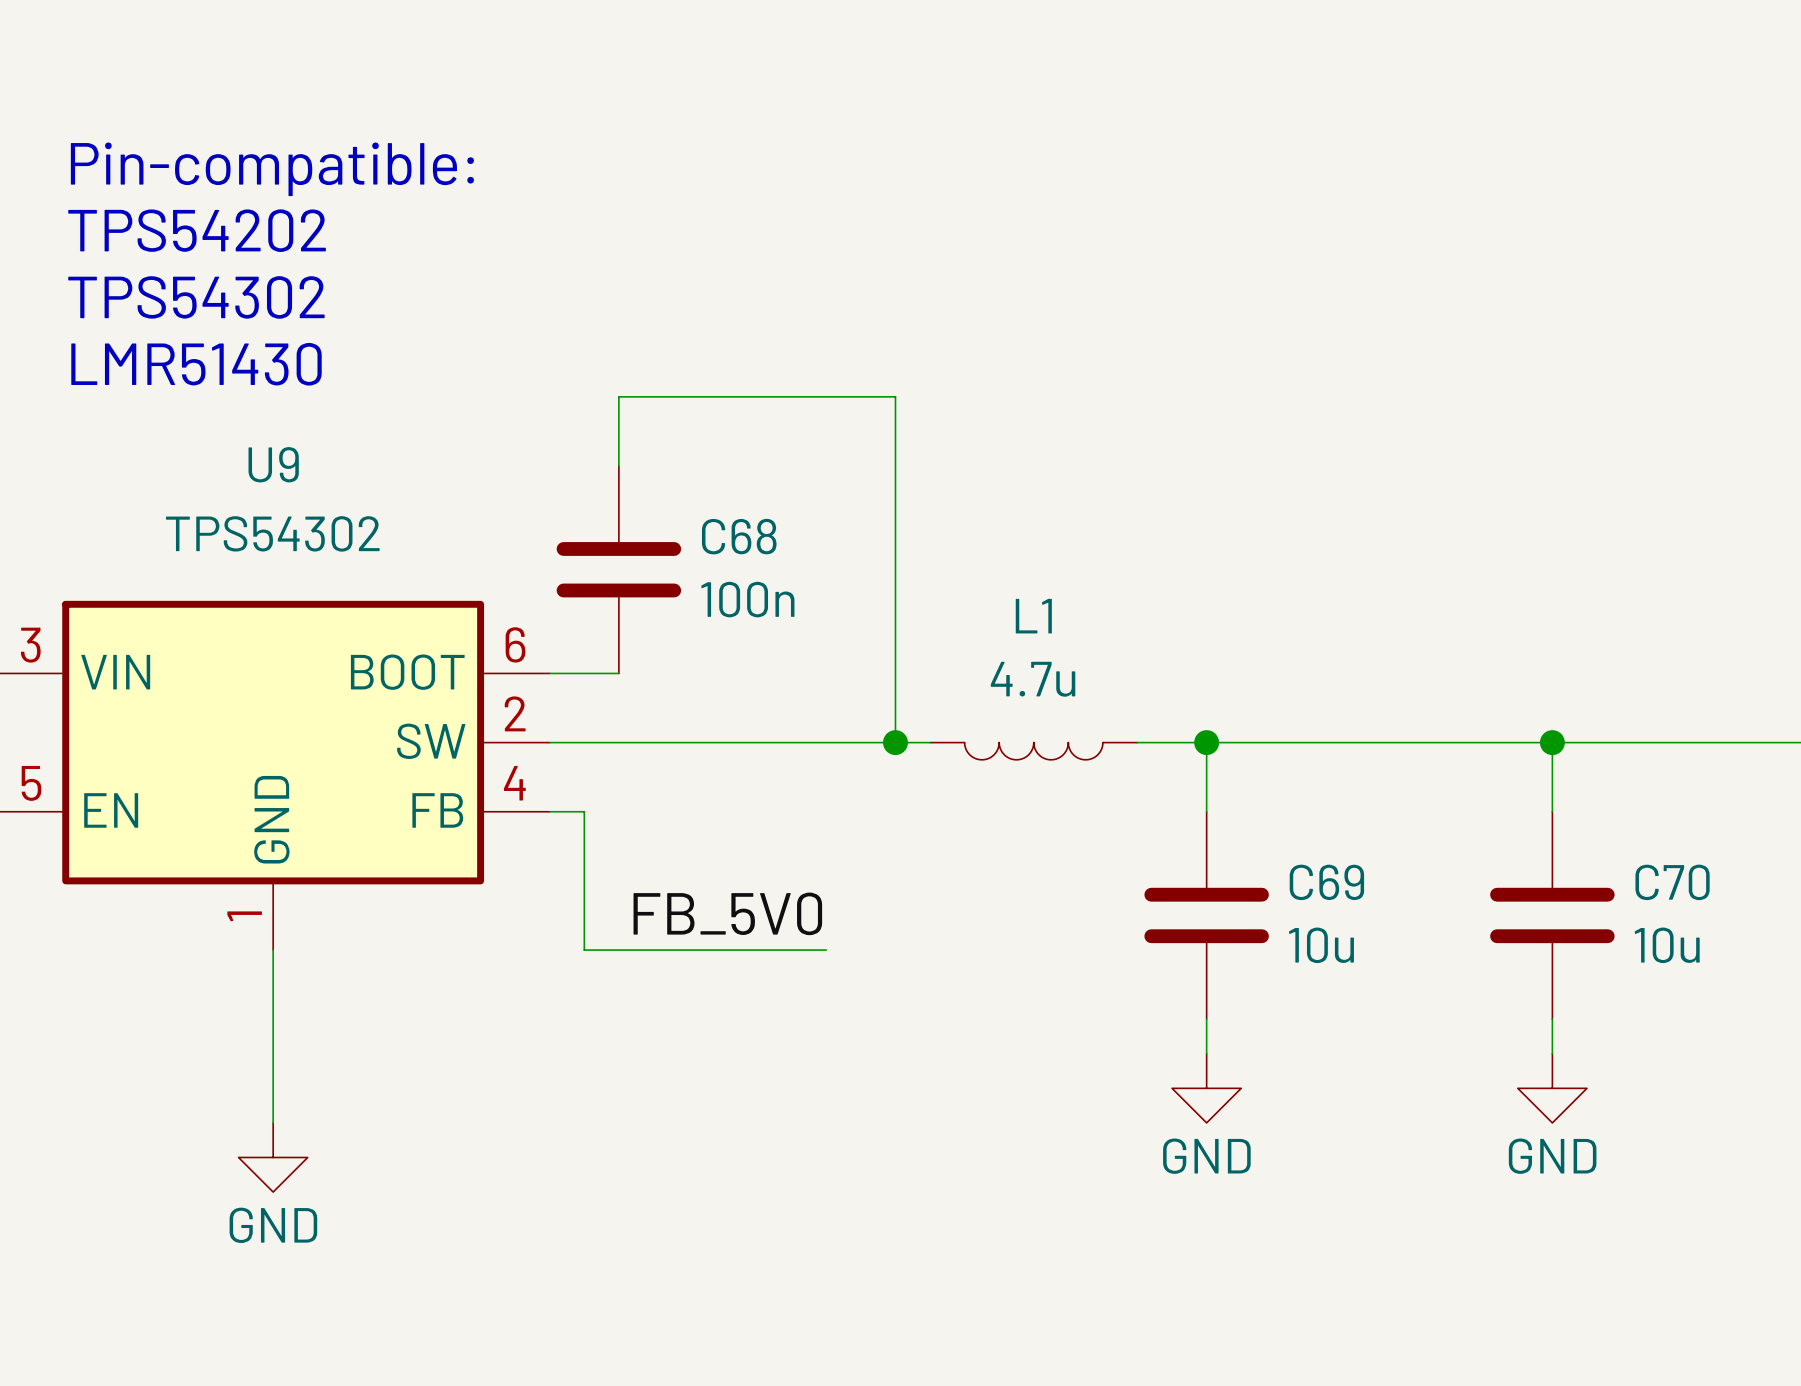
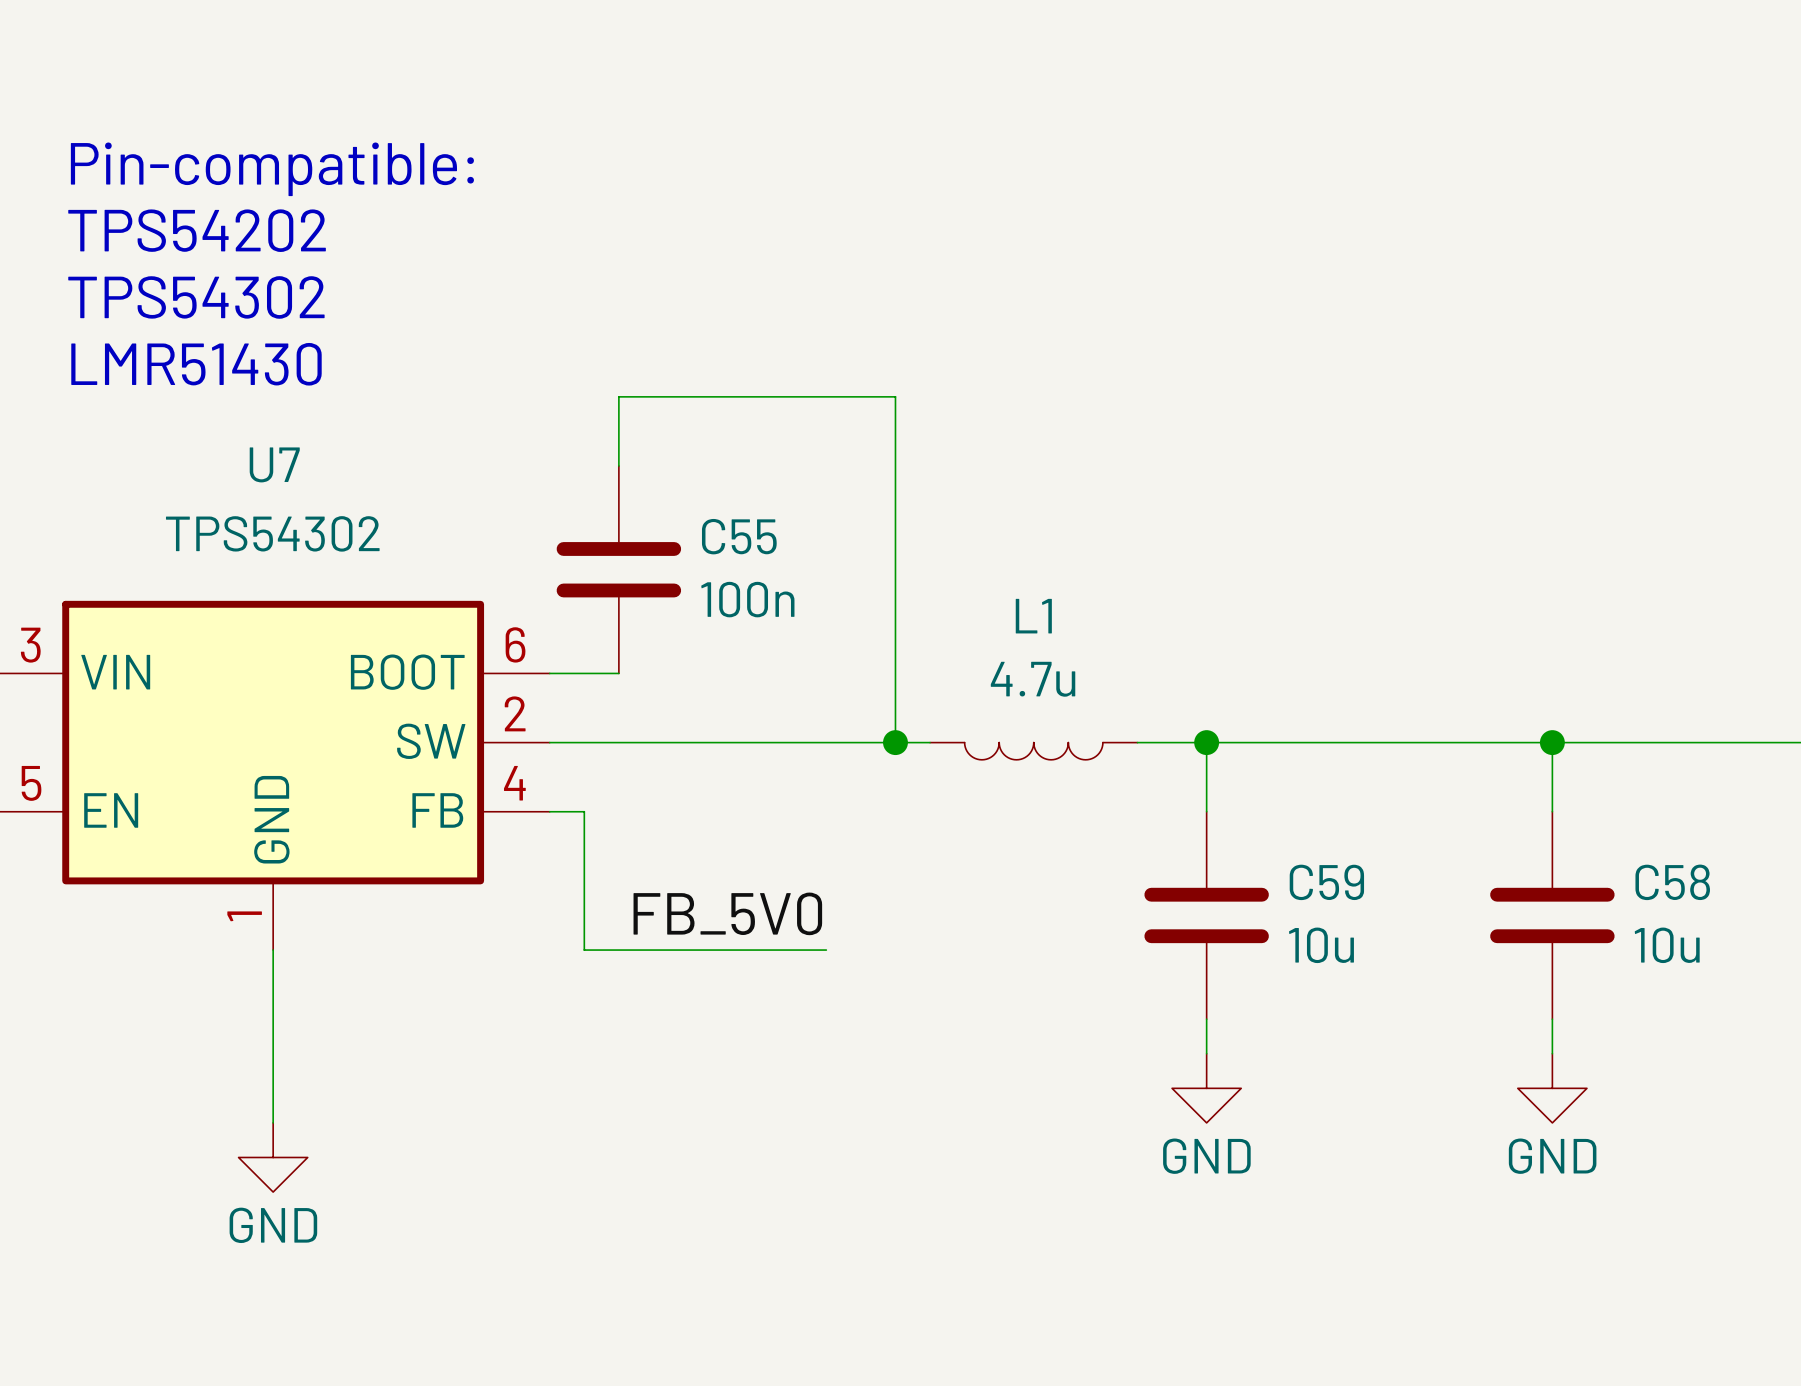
U9 name: U9 (273, 464) -> U7 (274, 464)
C68 name: C68 (739, 536) -> C55 (739, 536)
C69 name: C69 (1326, 882) -> C59 (1326, 882)
C70 name: C70 (1672, 882) -> C58 (1672, 882)

